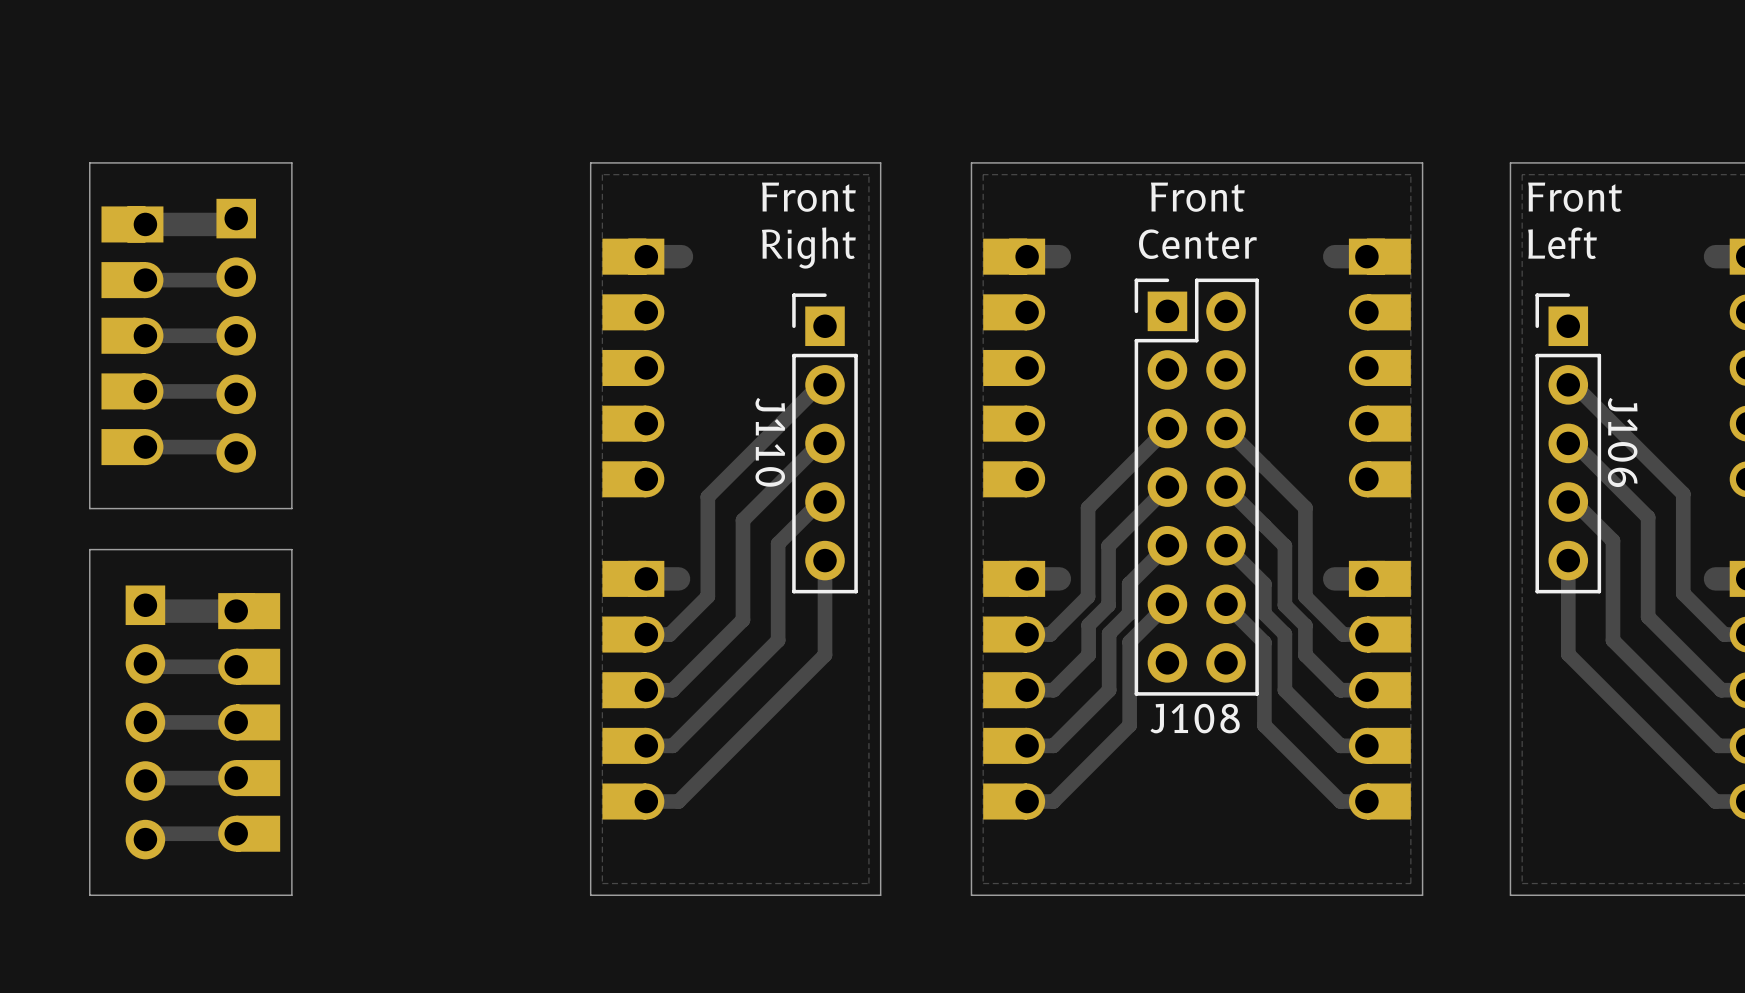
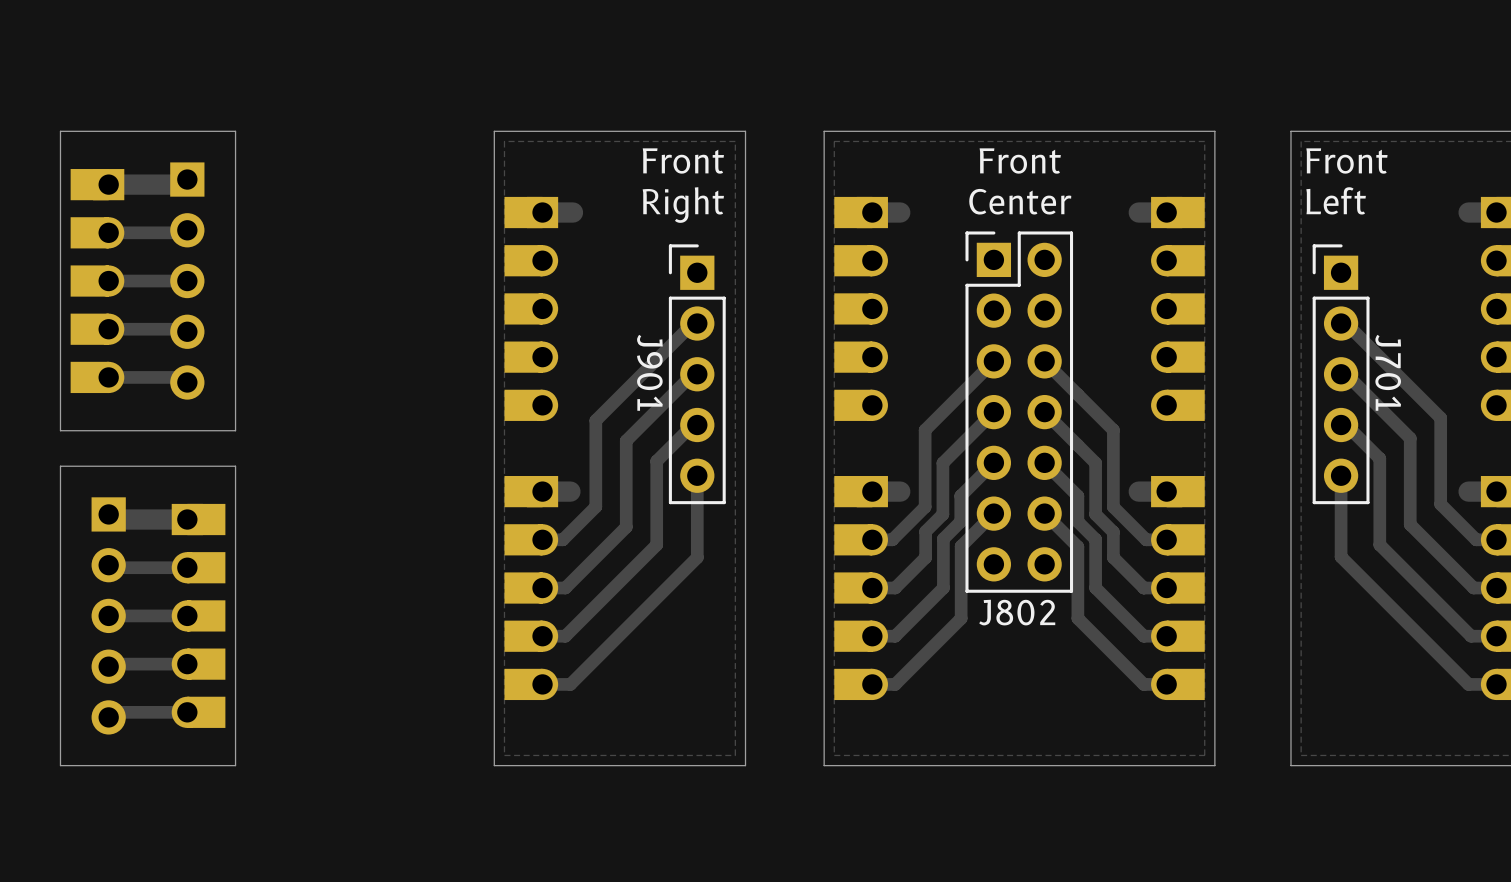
J110 name: J110 (770, 442) -> J901 (649, 372)
J106 name: J106 (1622, 442) -> J701 (1388, 372)
J108 name: J108 (1195, 718) -> J802 (1017, 612)

